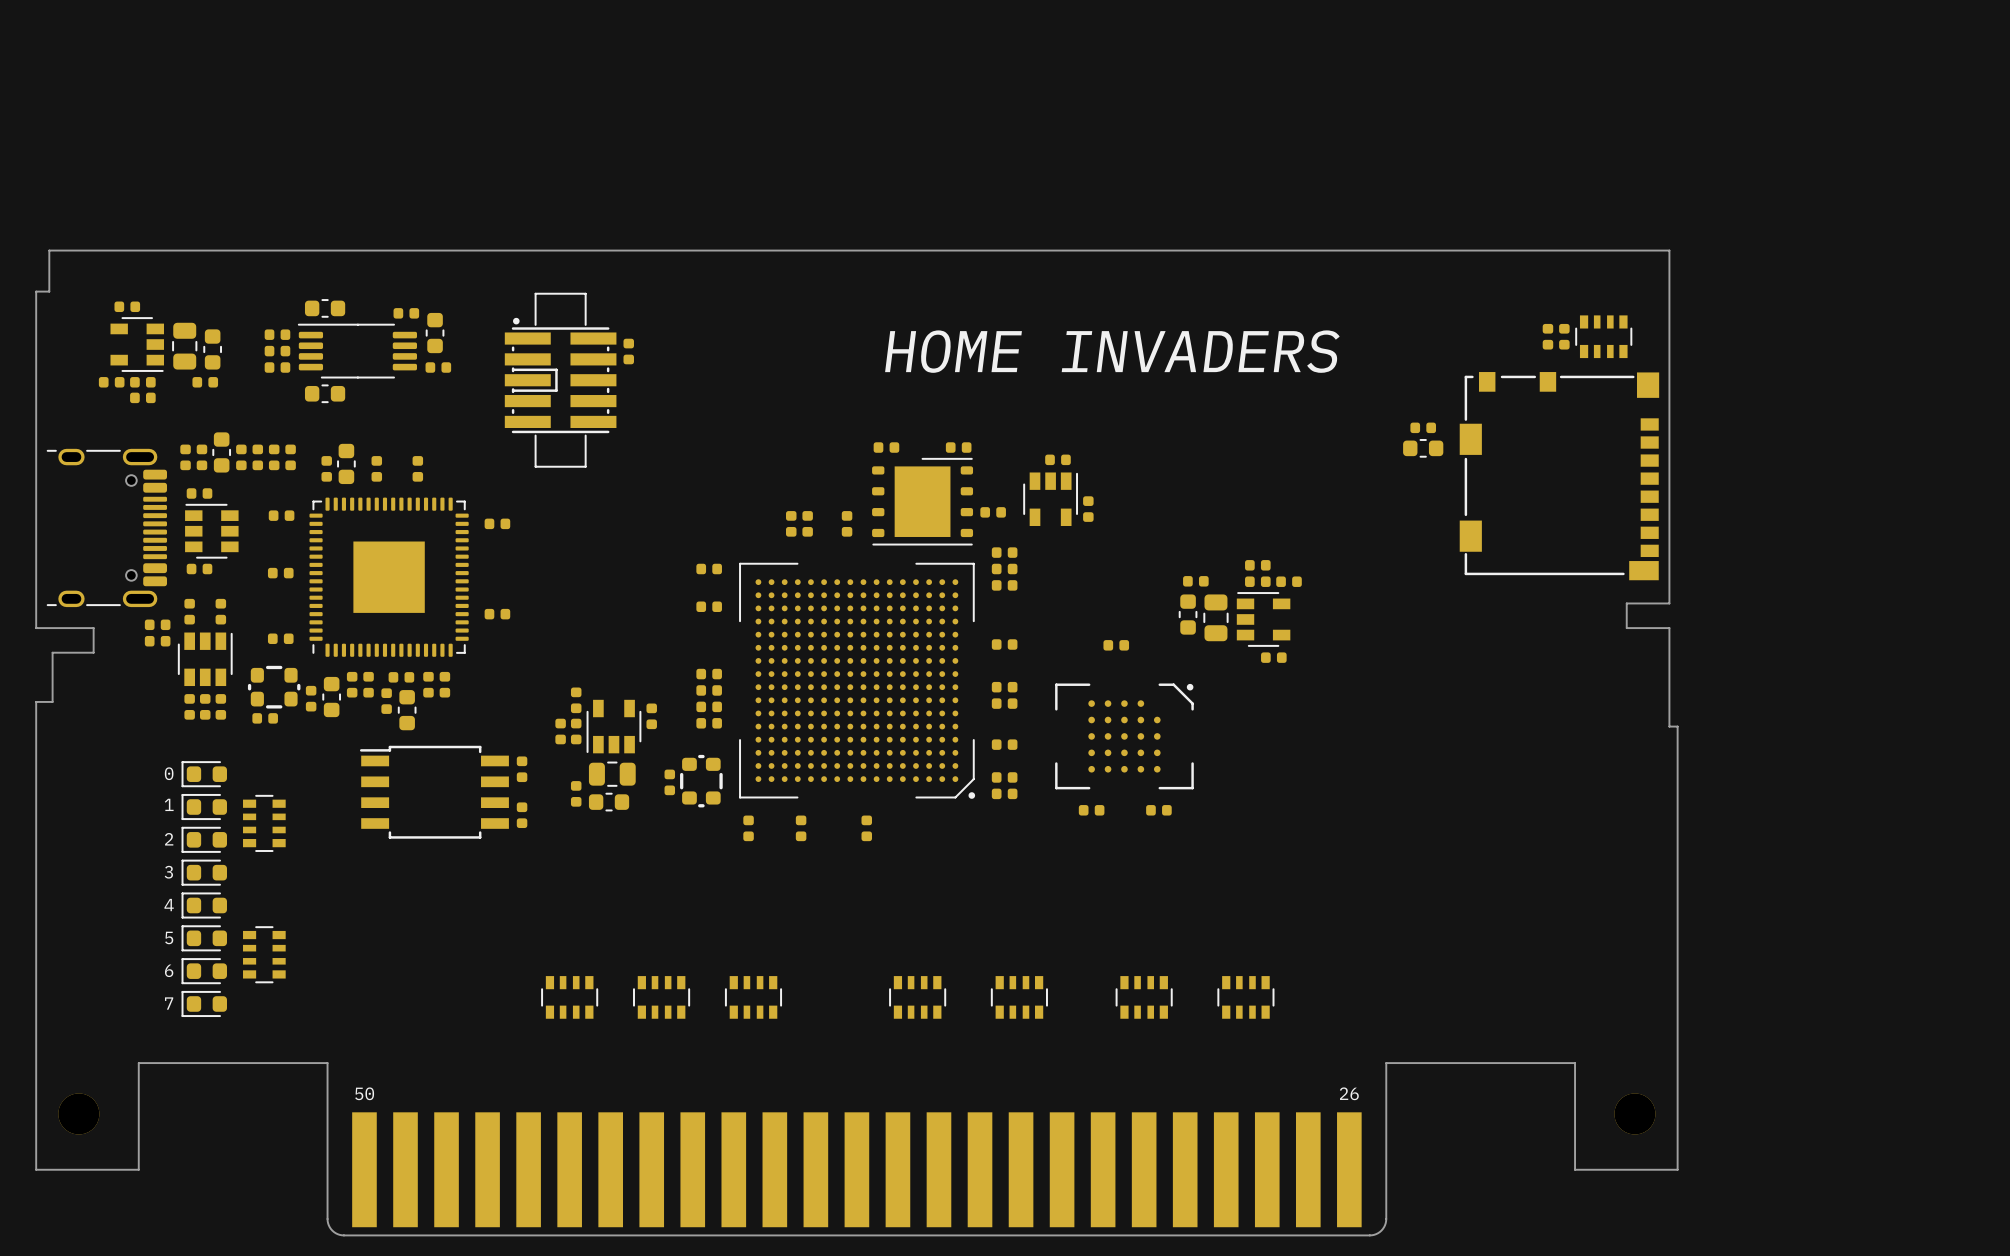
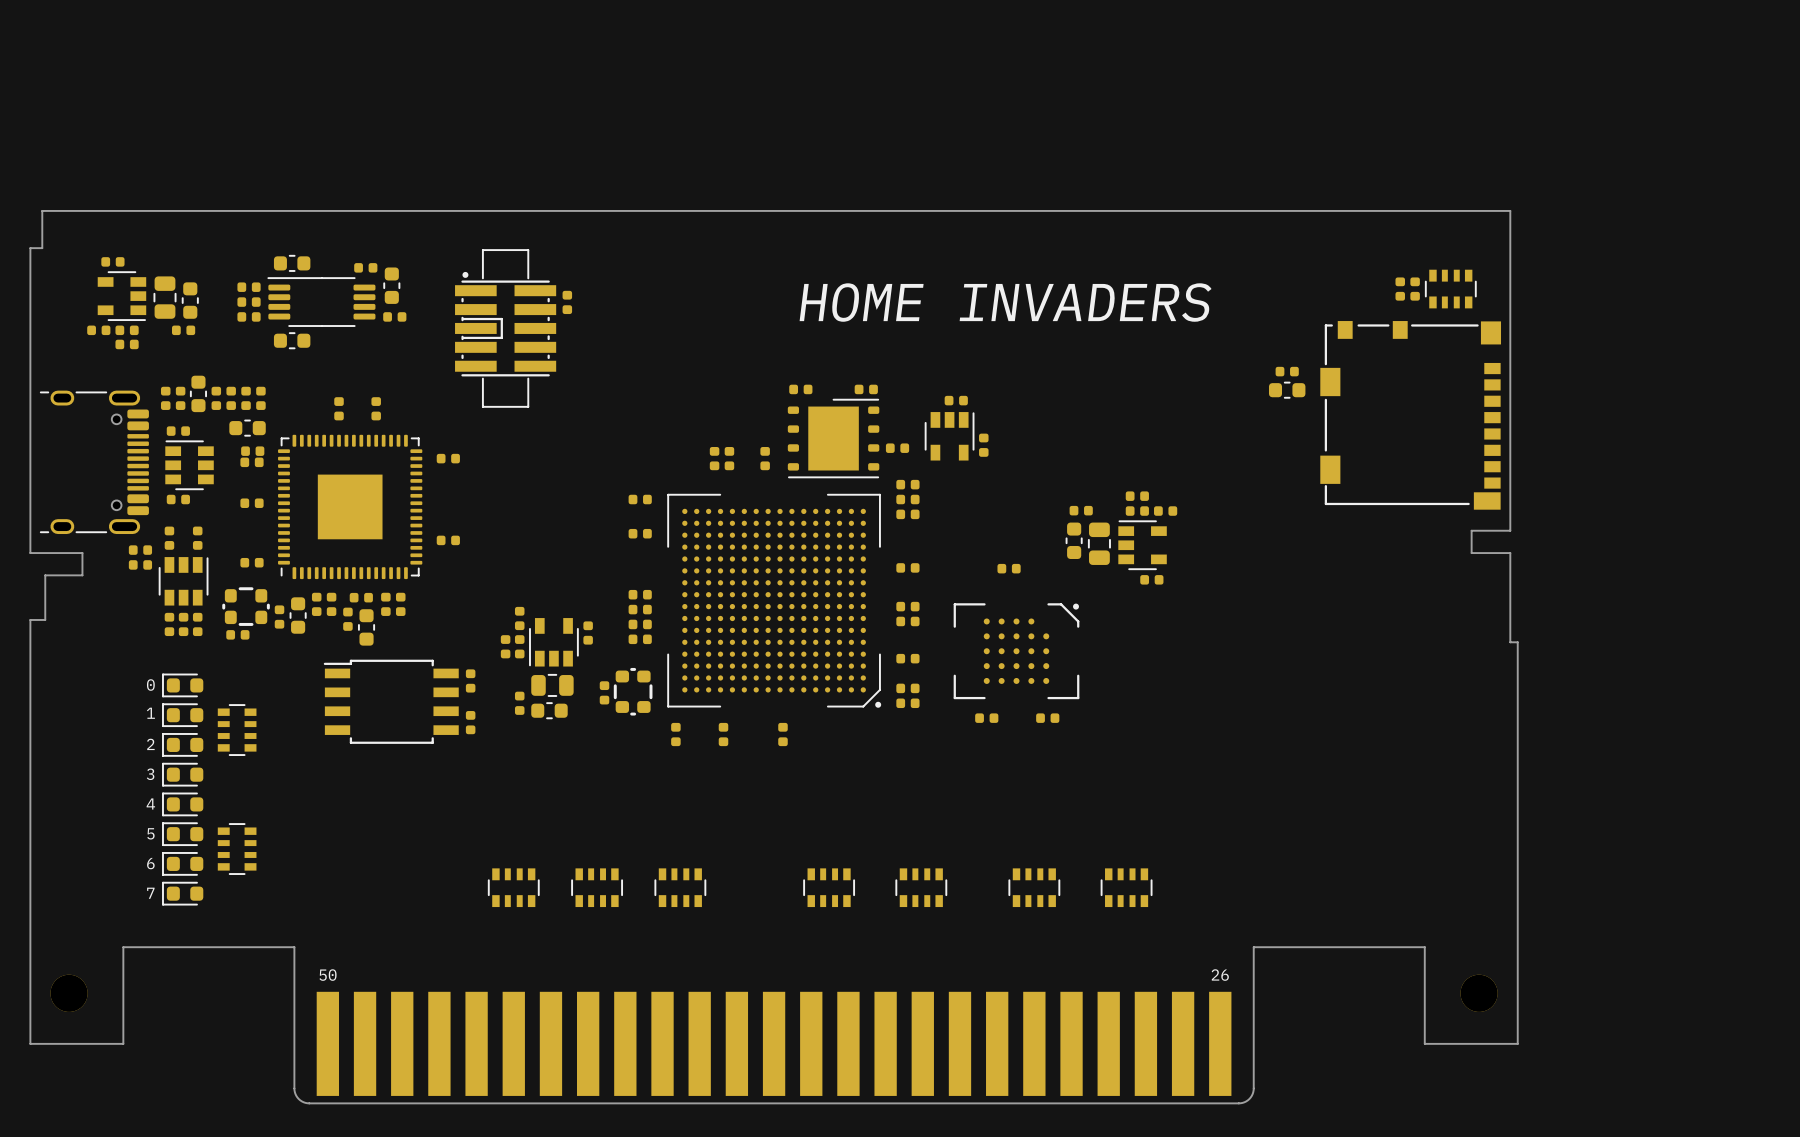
part rotation: 0° (346, 463) -> 90° clockwise (247, 428)
part position: (346, 463) -> (247, 428)
part rotation: 0° (326, 468) -> 90° clockwise (252, 462)
part position: (326, 468) -> (252, 462)

